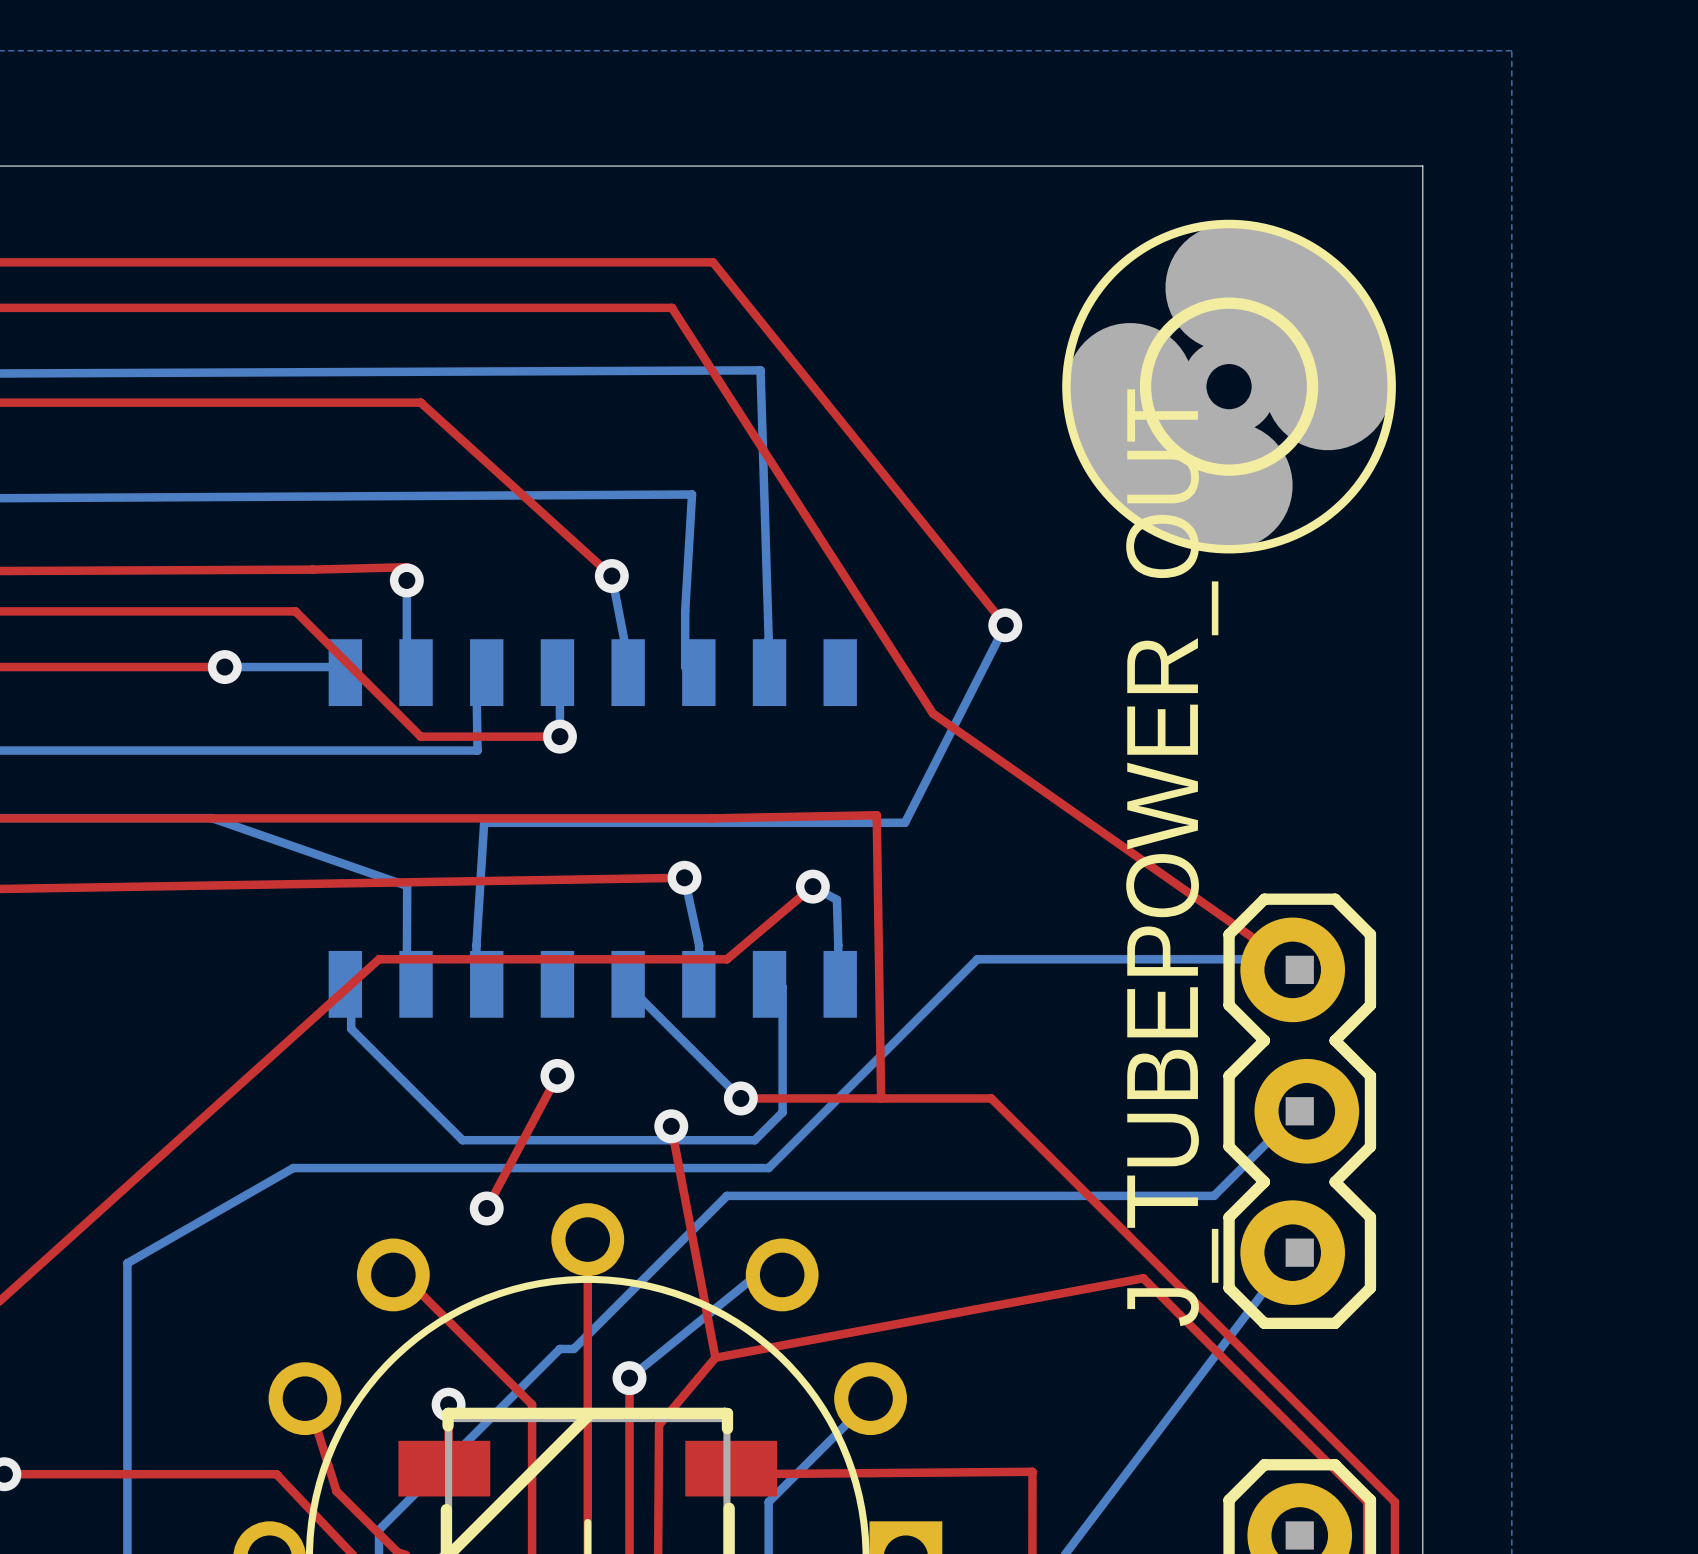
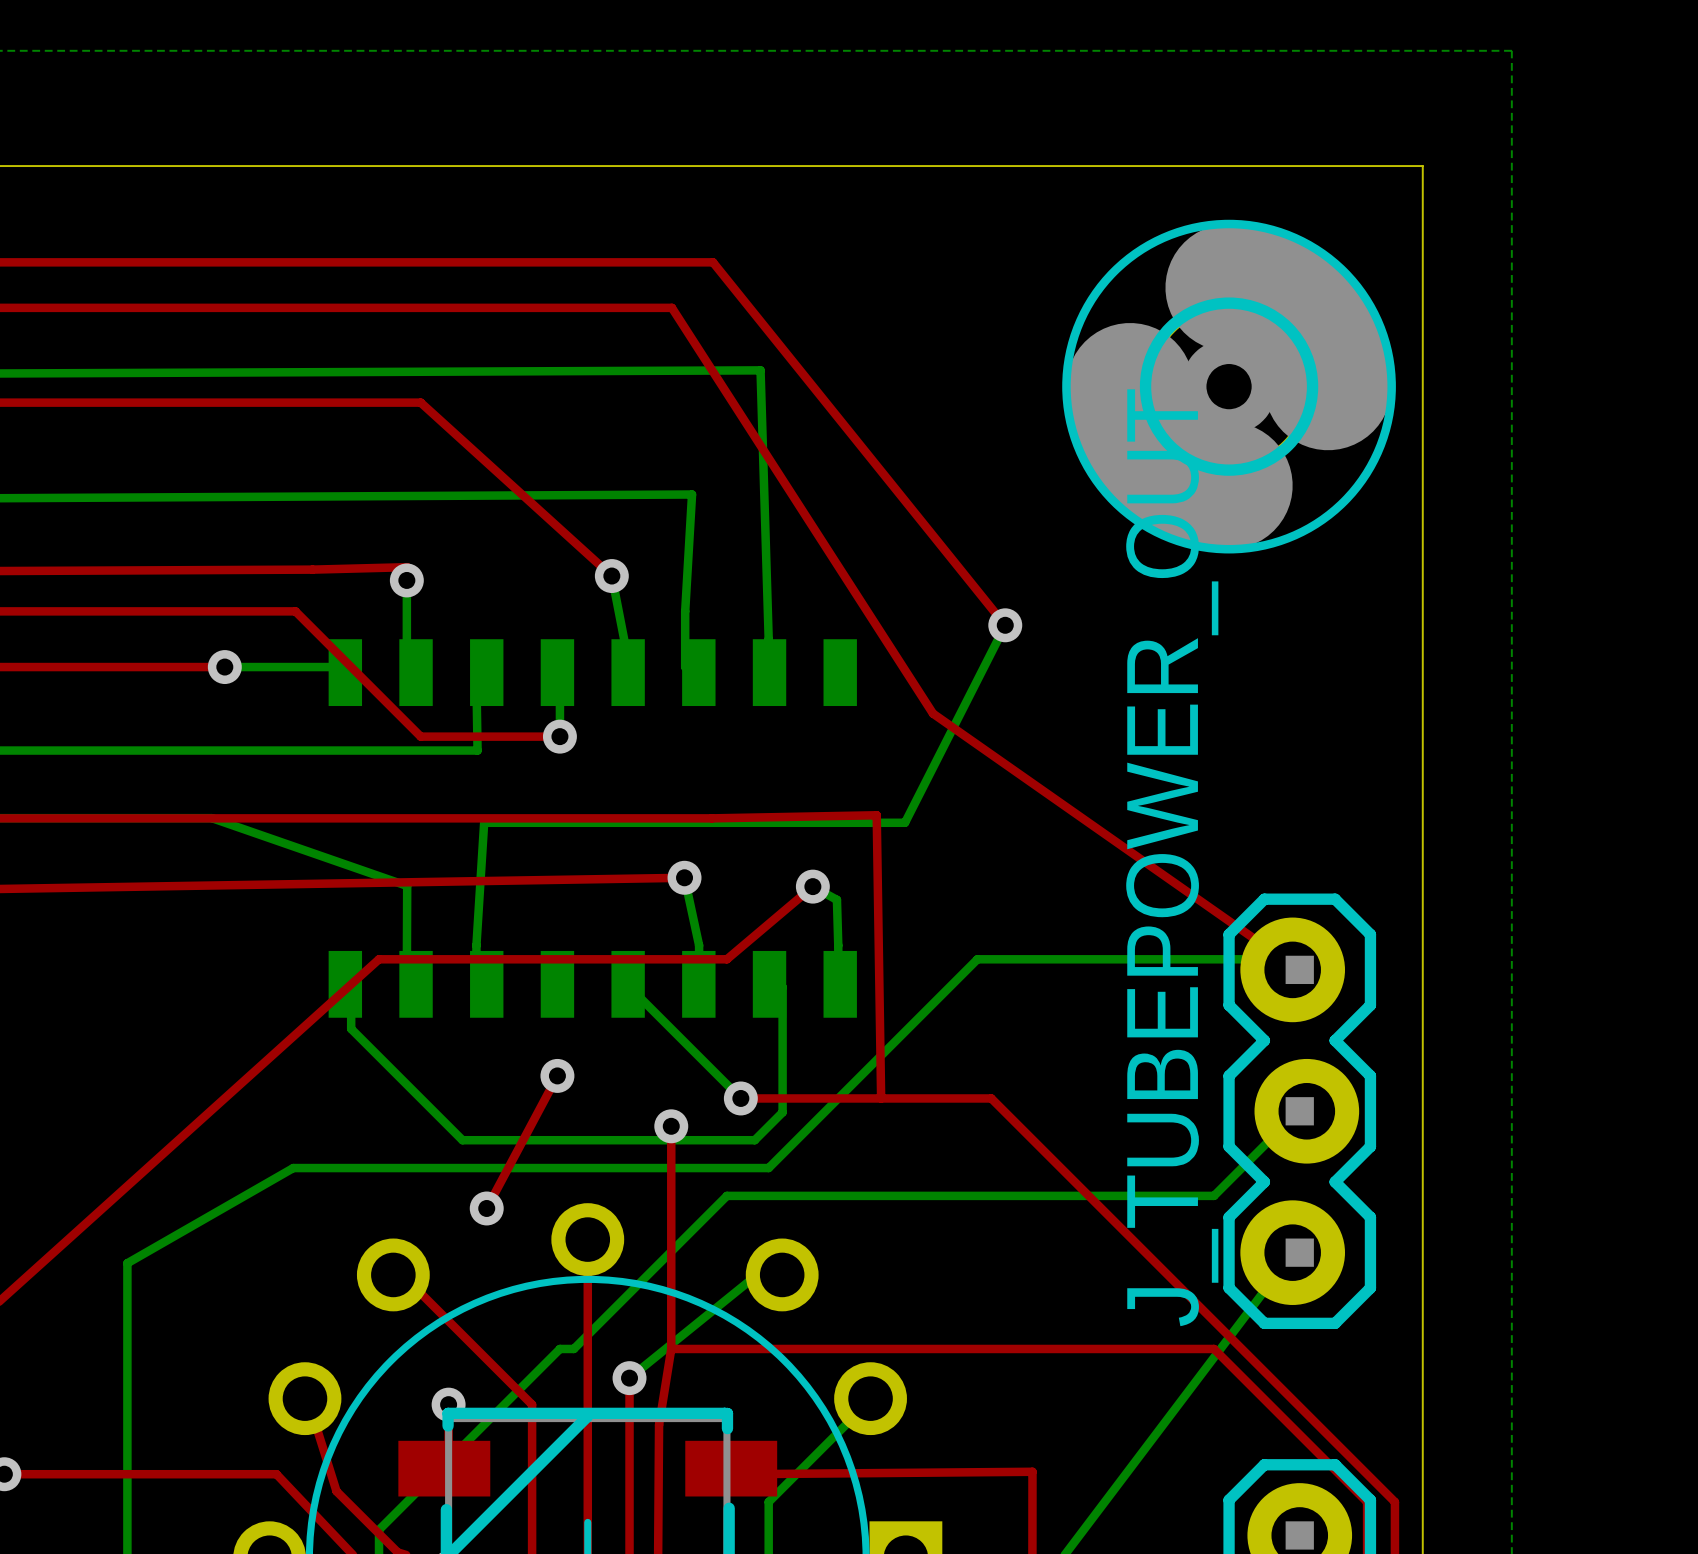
top track: (671, 1126) (715, 1357) -> (671, 1126) (671, 1348)
top track: (1214, 1348) (1143, 1278) (715, 1357) -> (1214, 1348) (671, 1348)
top track: (715, 1357) (659, 1424) -> (671, 1348) (659, 1424)

